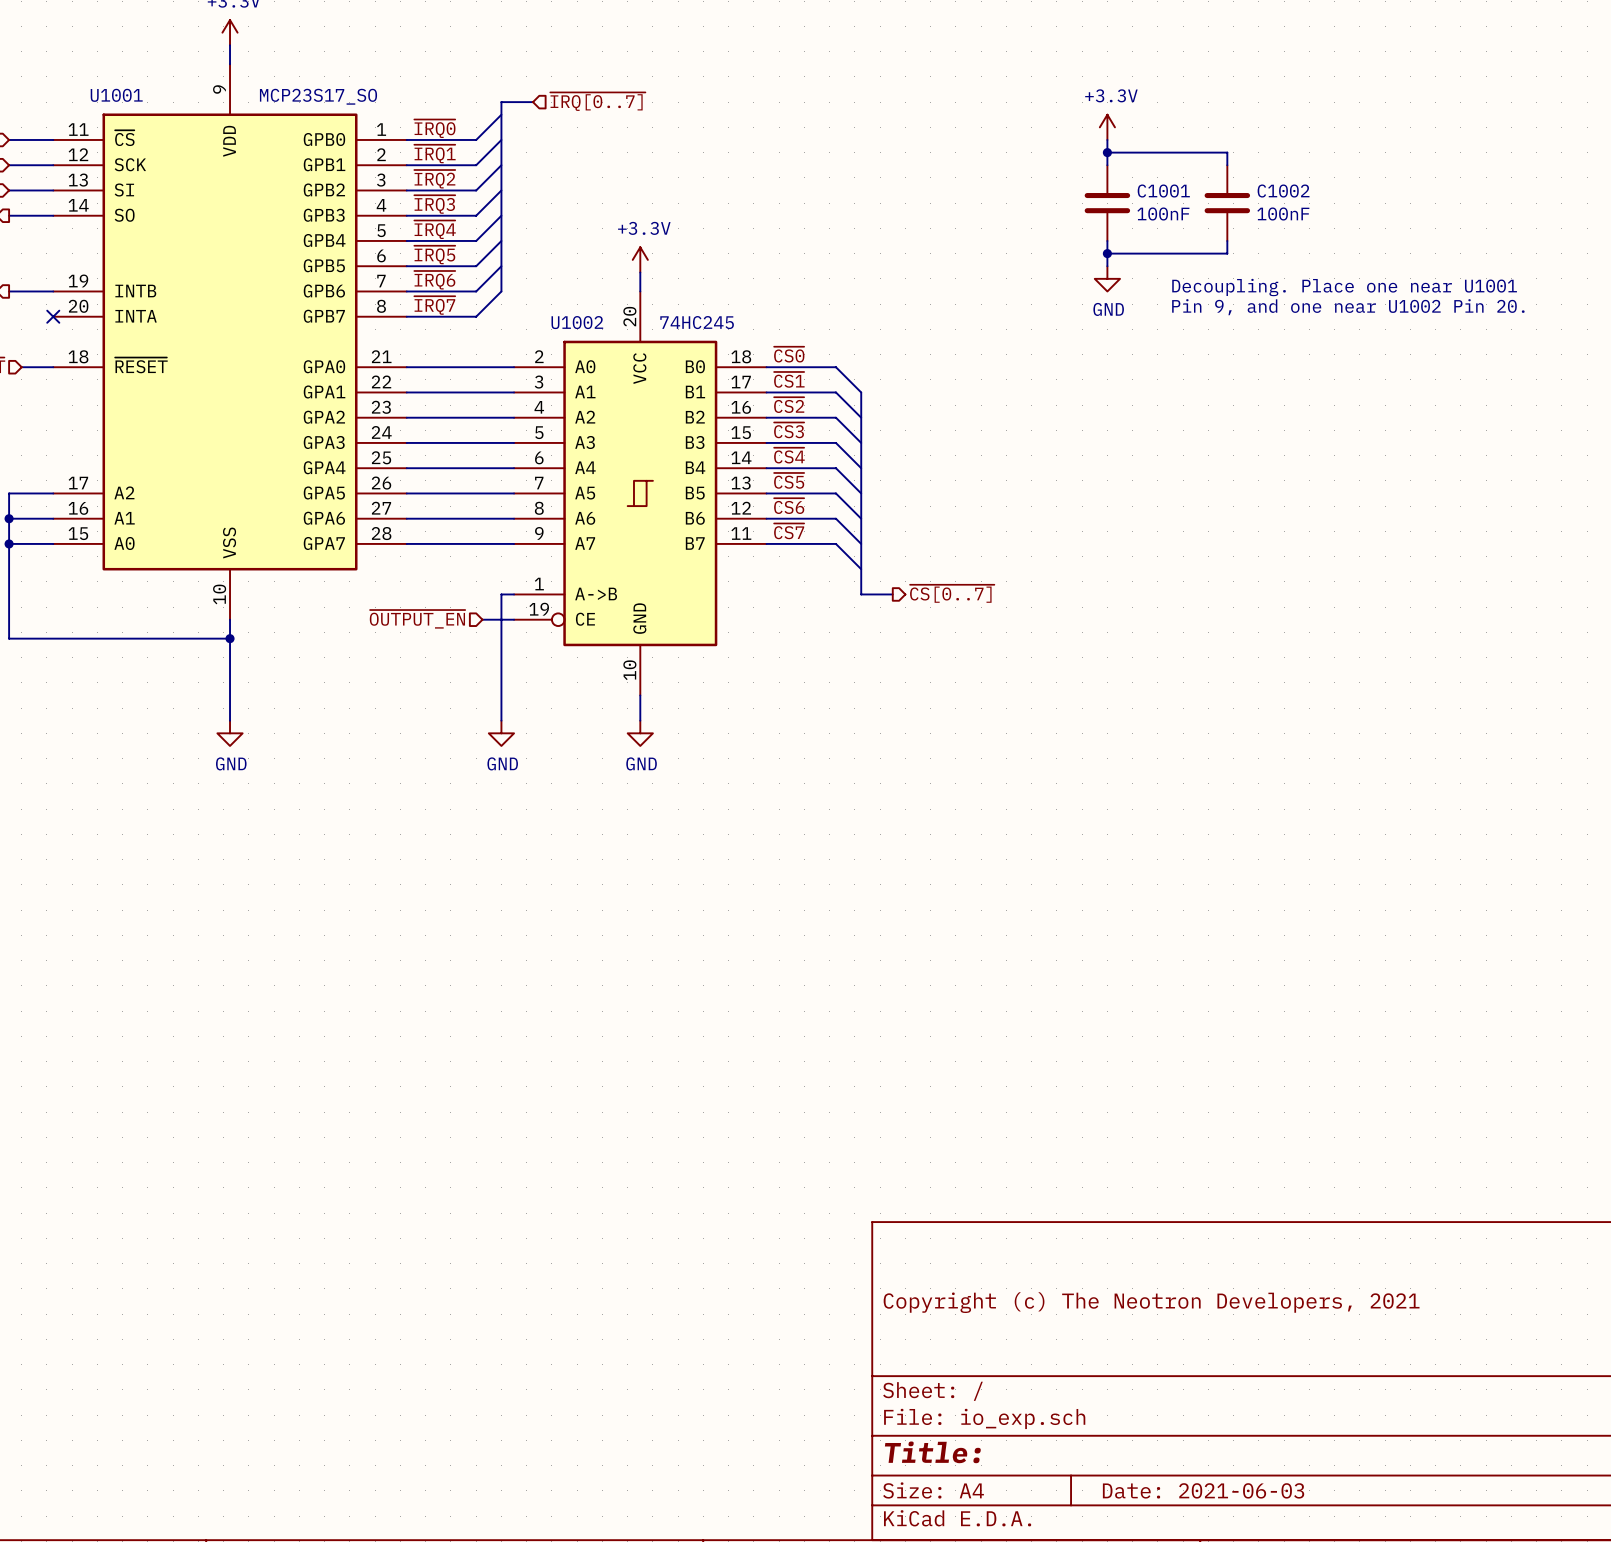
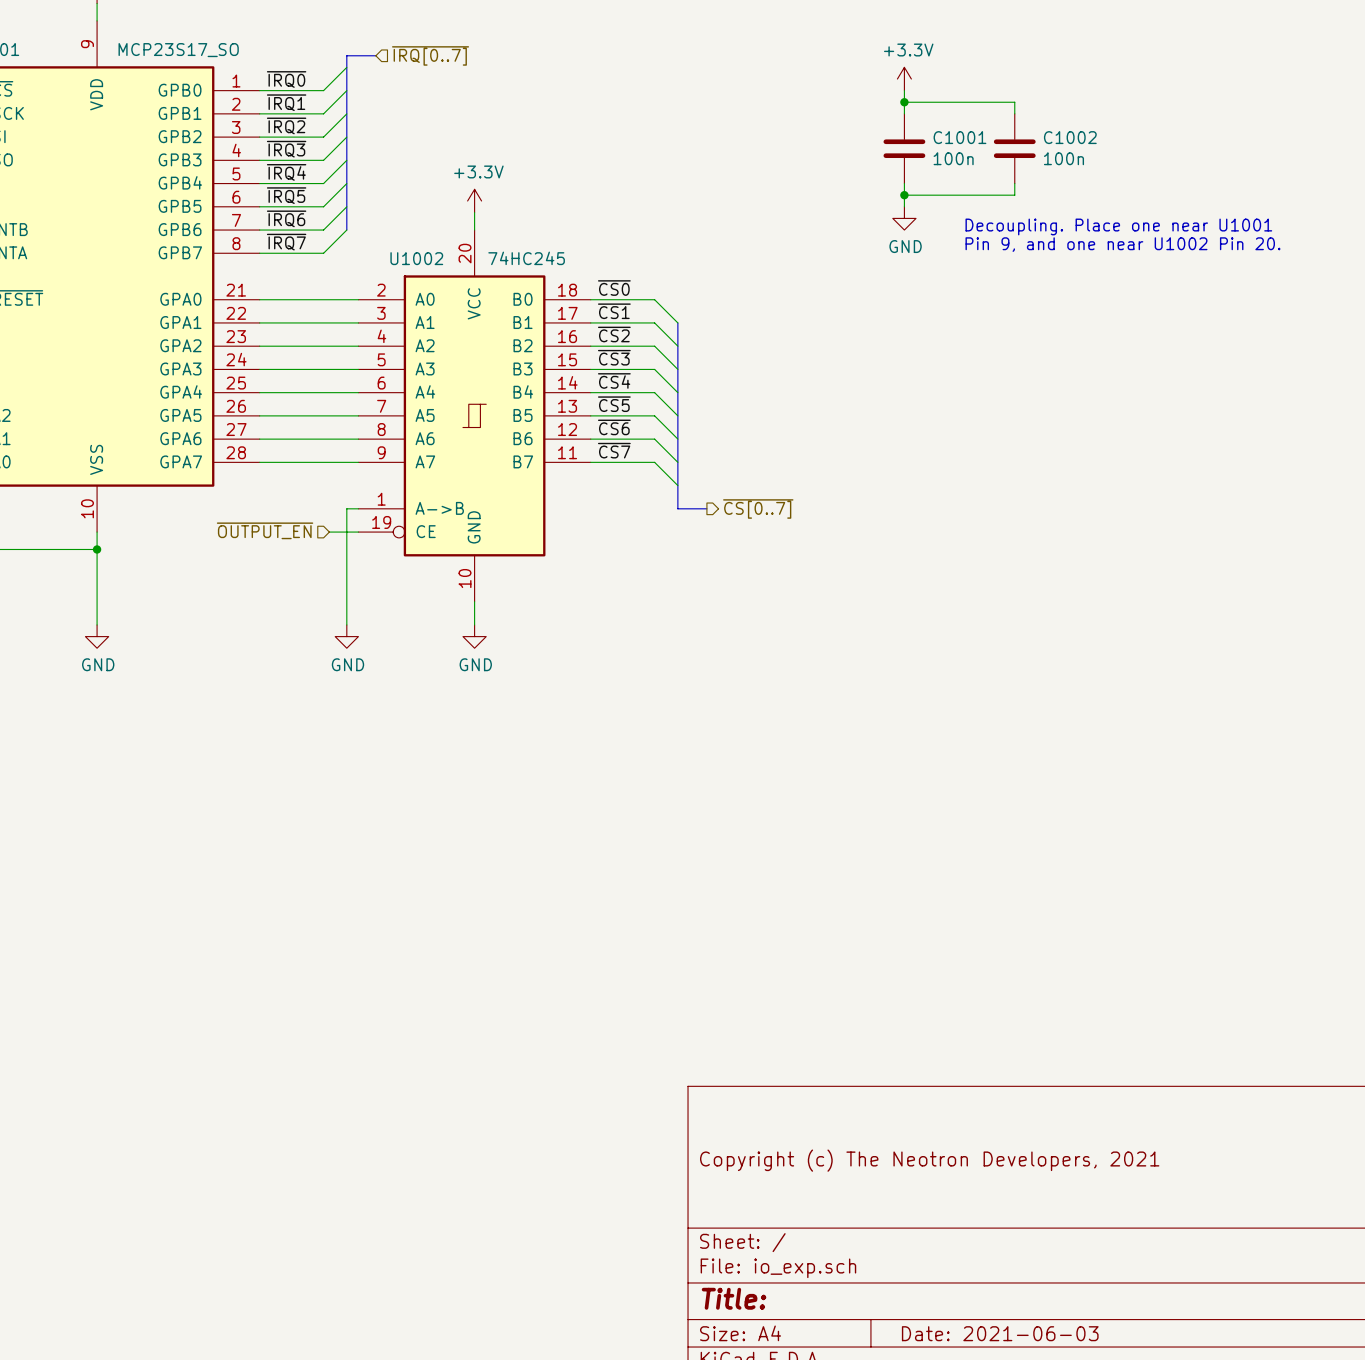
C1001 value: 100nF (1163, 213) -> 100n (953, 158)
C1002 value: 100nF (1283, 213) -> 100n (1063, 158)

